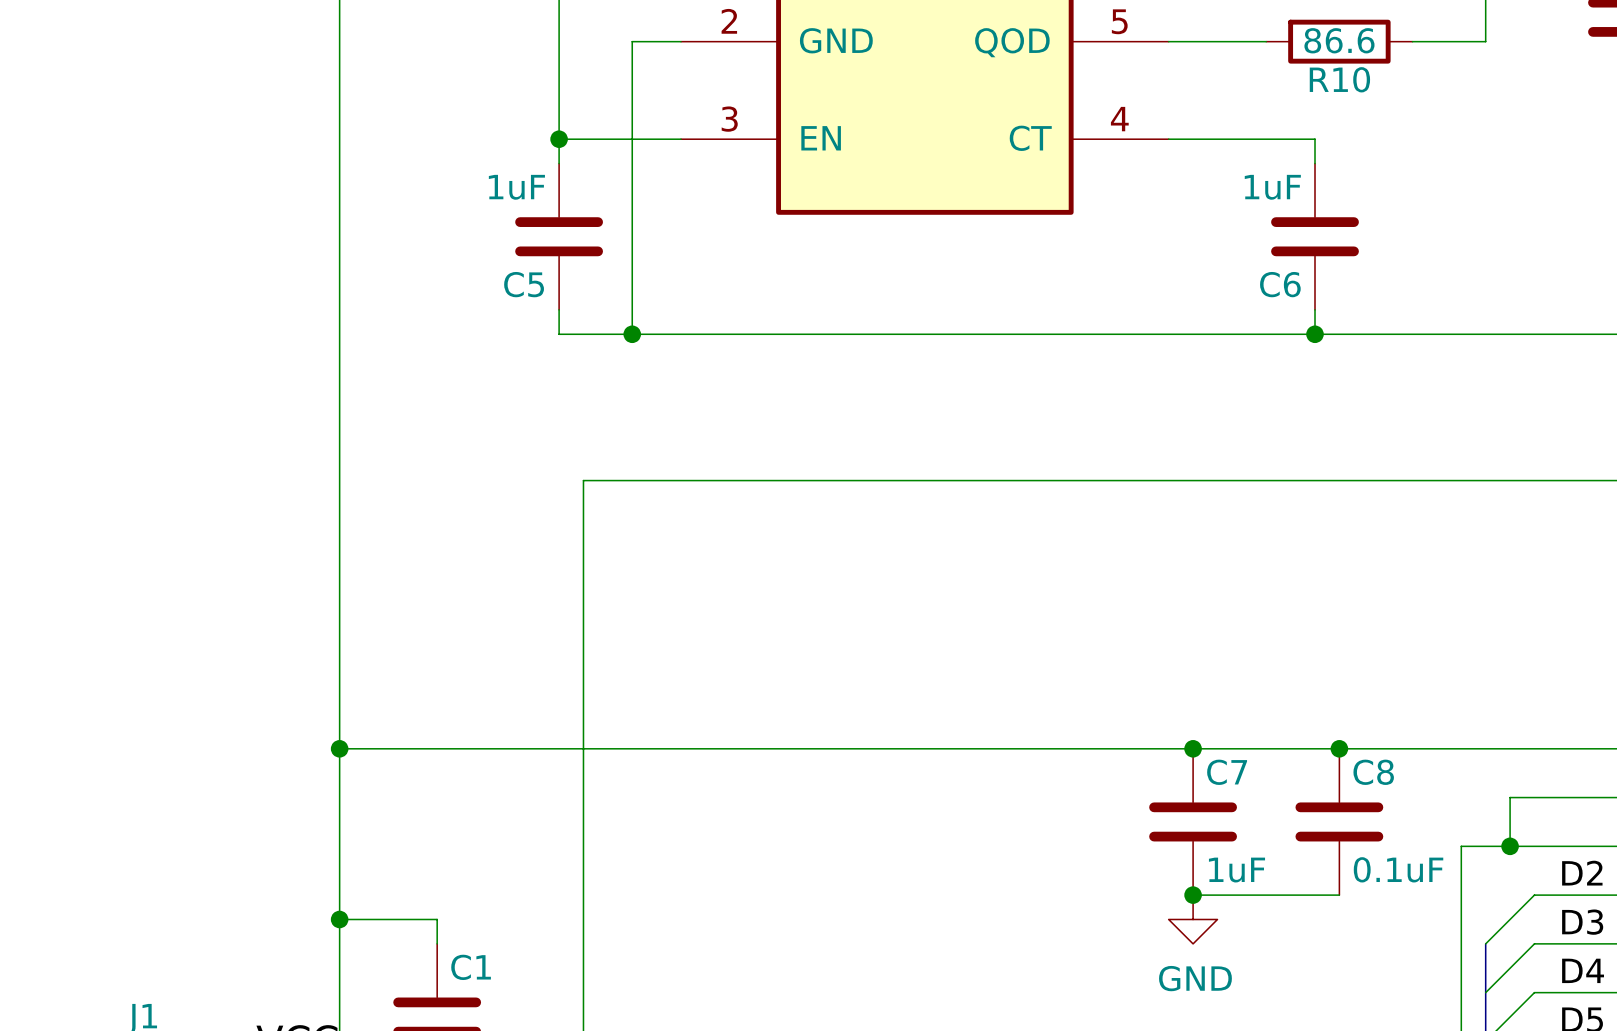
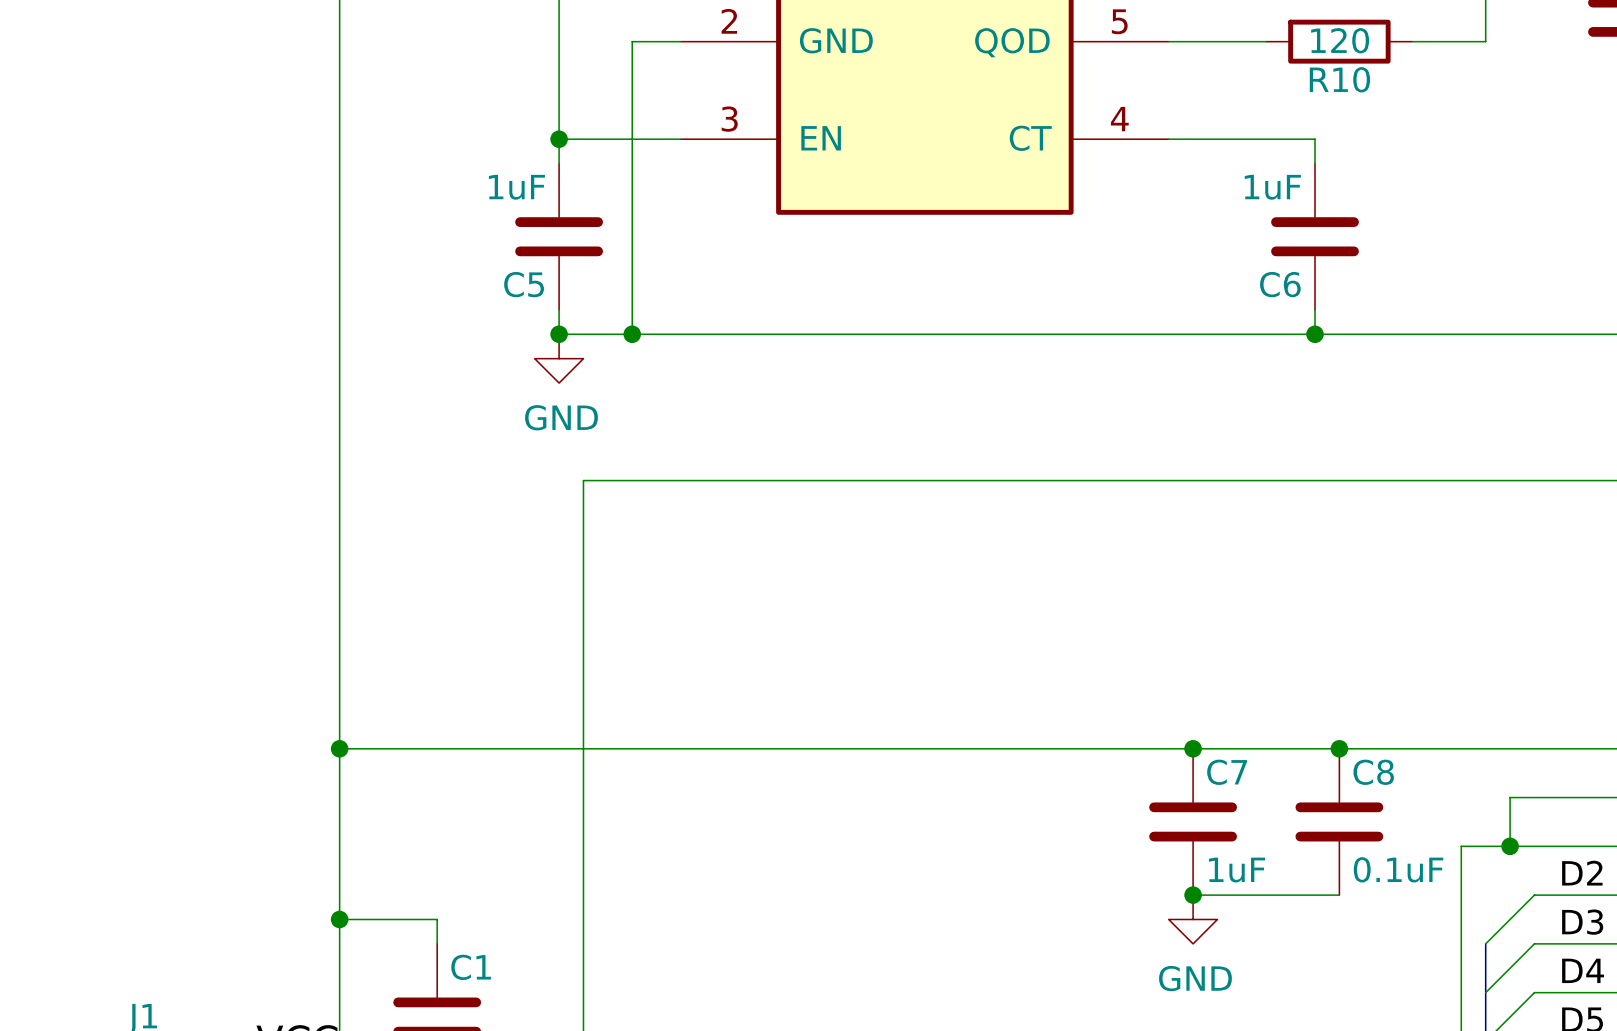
R10 value: 86.6 (1339, 40) -> 120 (1340, 40)
junction: none -> (559, 334)
power symbol: none -> GND (559, 358)

